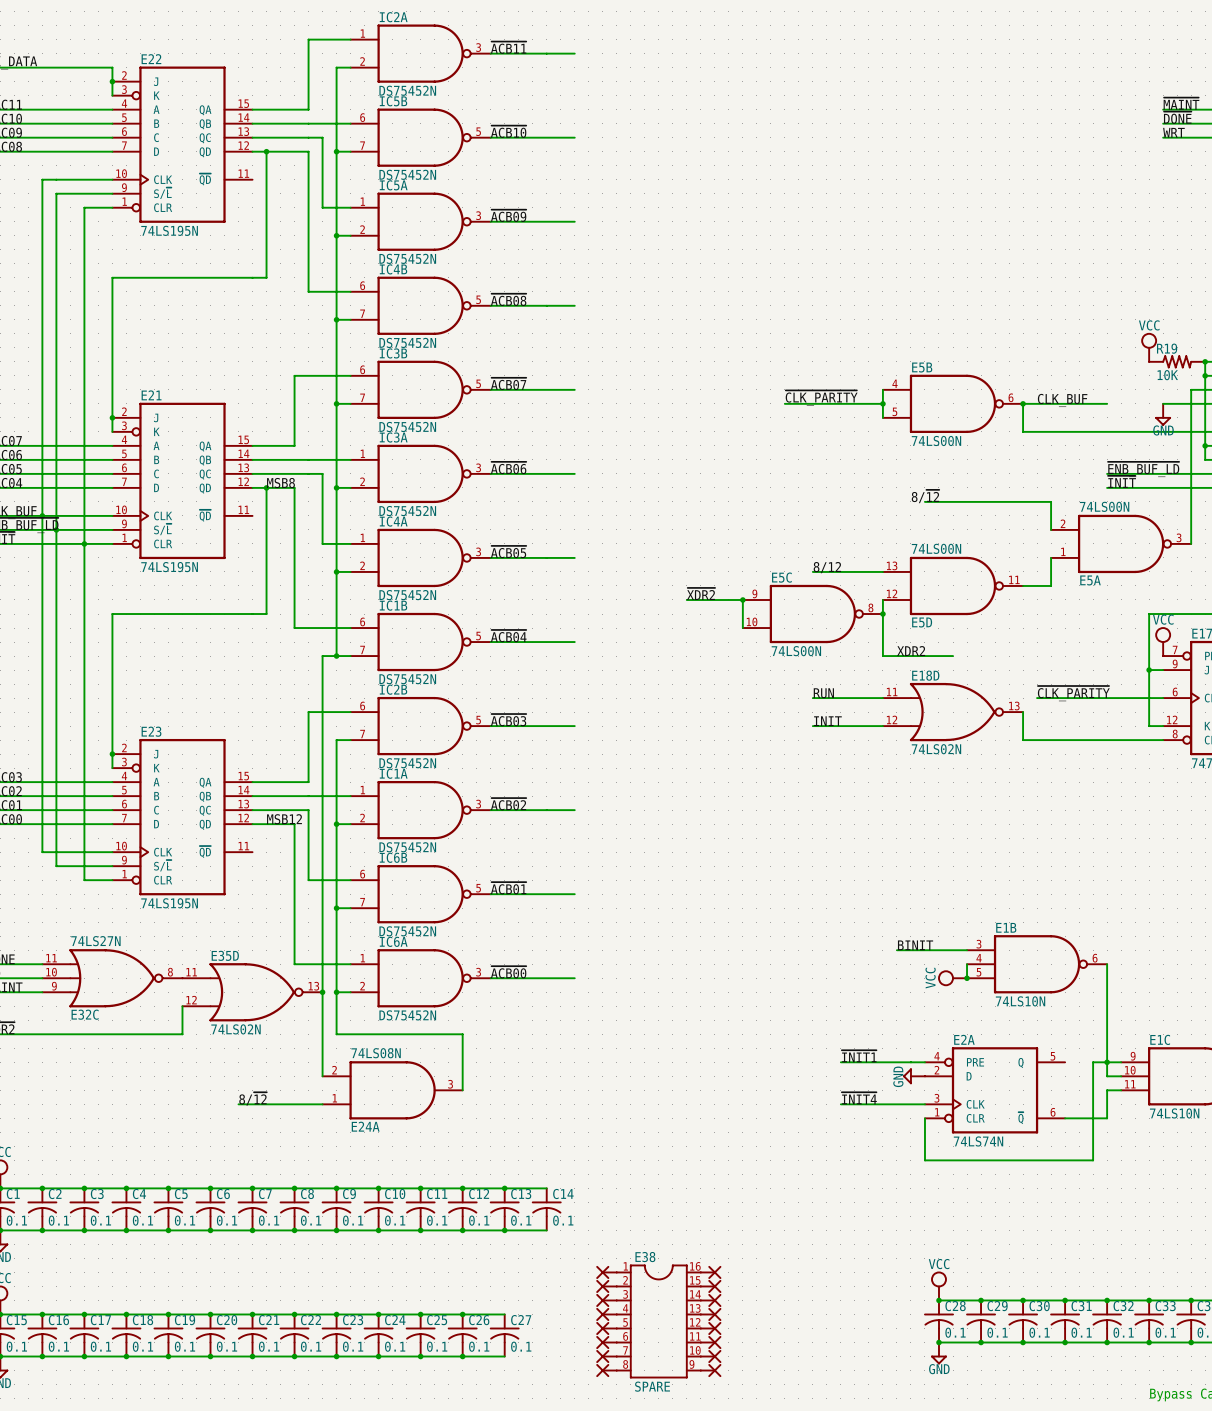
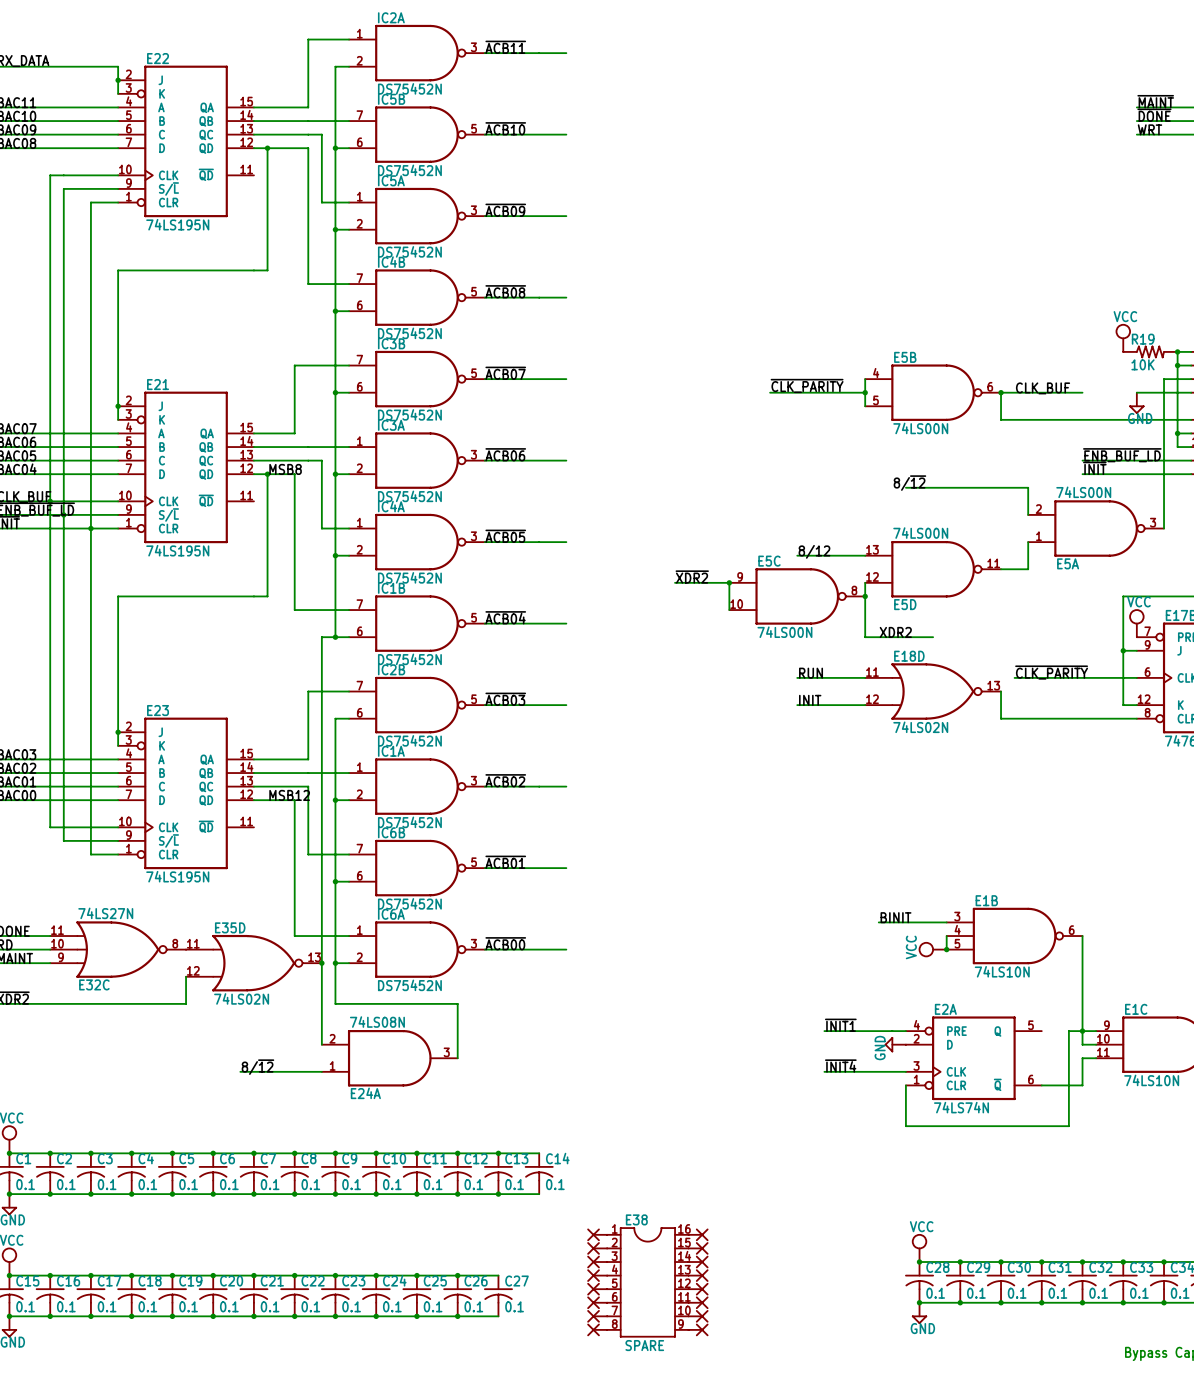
IC5B flip: as is (420, 137) -> up-down (416, 134)
IC4B flip: as is (420, 305) -> up-down (416, 297)
IC3B flip: as is (420, 389) -> up-down (416, 379)
IC1B flip: as is (420, 642) -> up-down (416, 623)
IC2B flip: as is (420, 726) -> up-down (416, 705)
IC6B flip: as is (420, 894) -> up-down (416, 868)

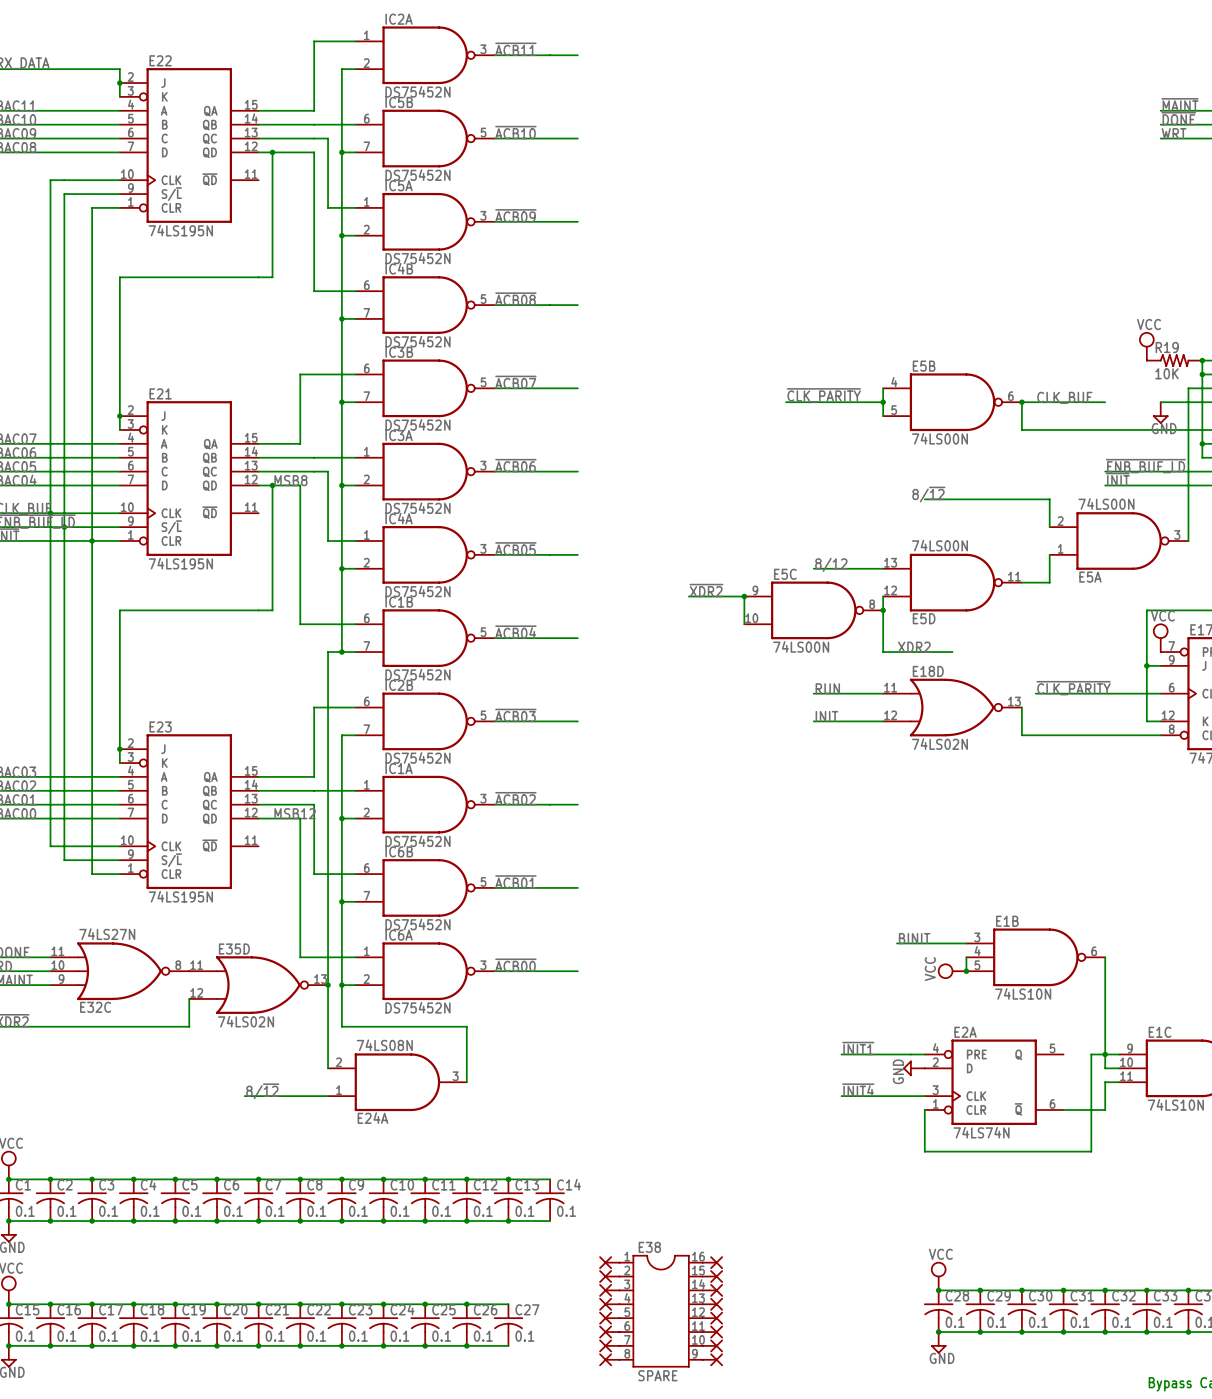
IC5B flip: as is (416, 134) -> up-down (425, 138)
IC4B flip: as is (416, 297) -> up-down (425, 305)
IC3B flip: as is (416, 379) -> up-down (425, 388)
IC1B flip: as is (416, 623) -> up-down (425, 638)
IC2B flip: as is (416, 705) -> up-down (425, 721)
IC6B flip: as is (416, 868) -> up-down (425, 887)

